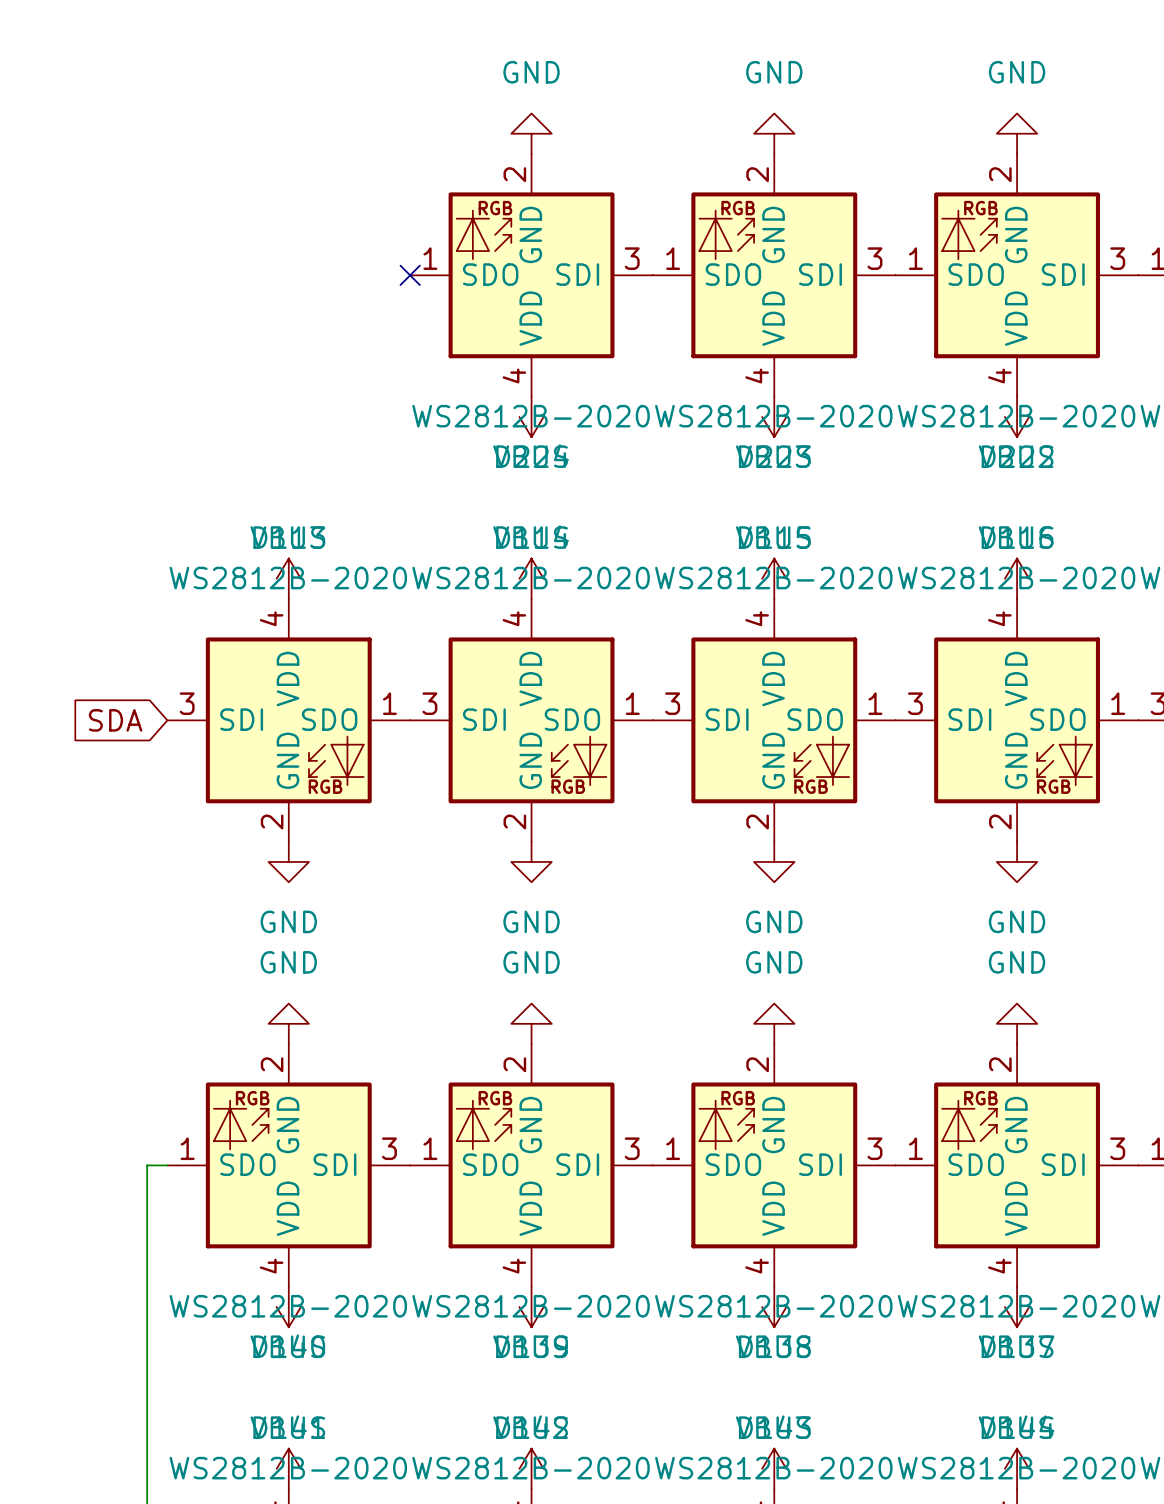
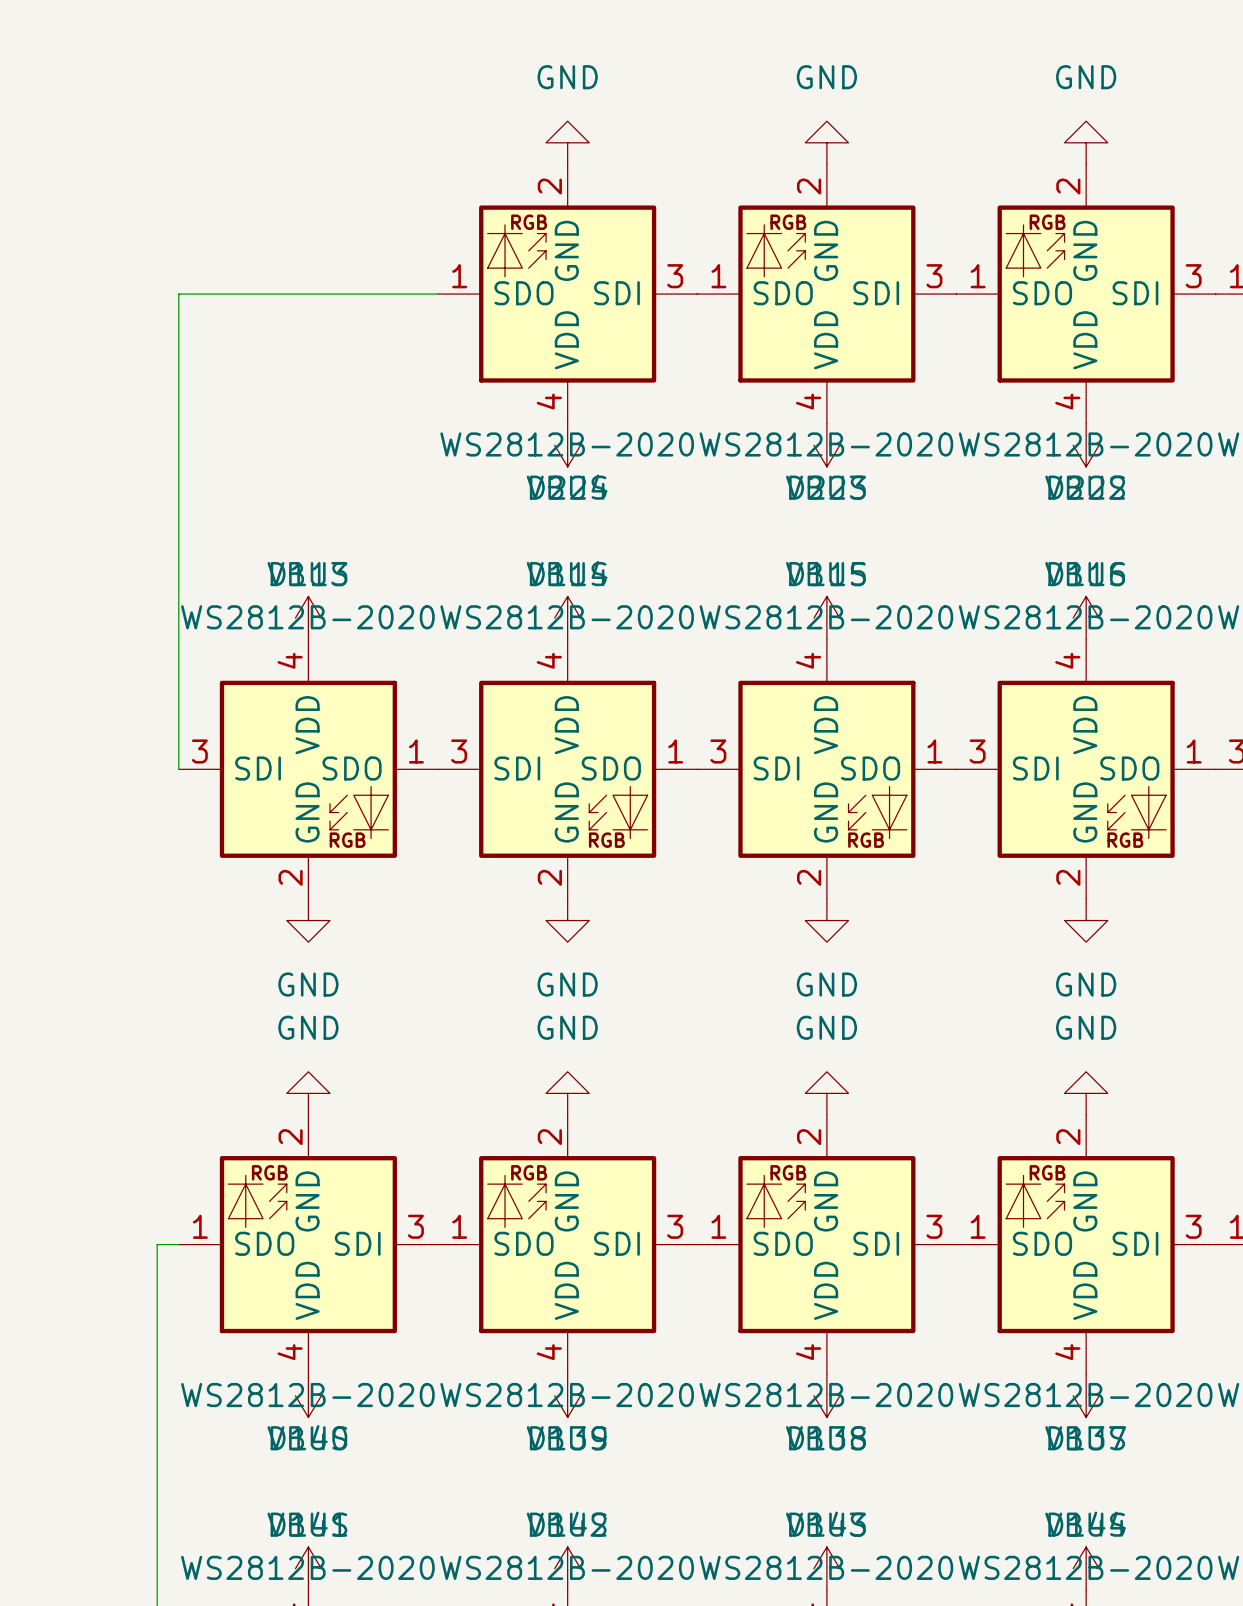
wire: none -> (438, 294) (178, 294) (178, 769)
no-connect mark: (410, 275) -> none
global label: SDA (115, 720) -> none

